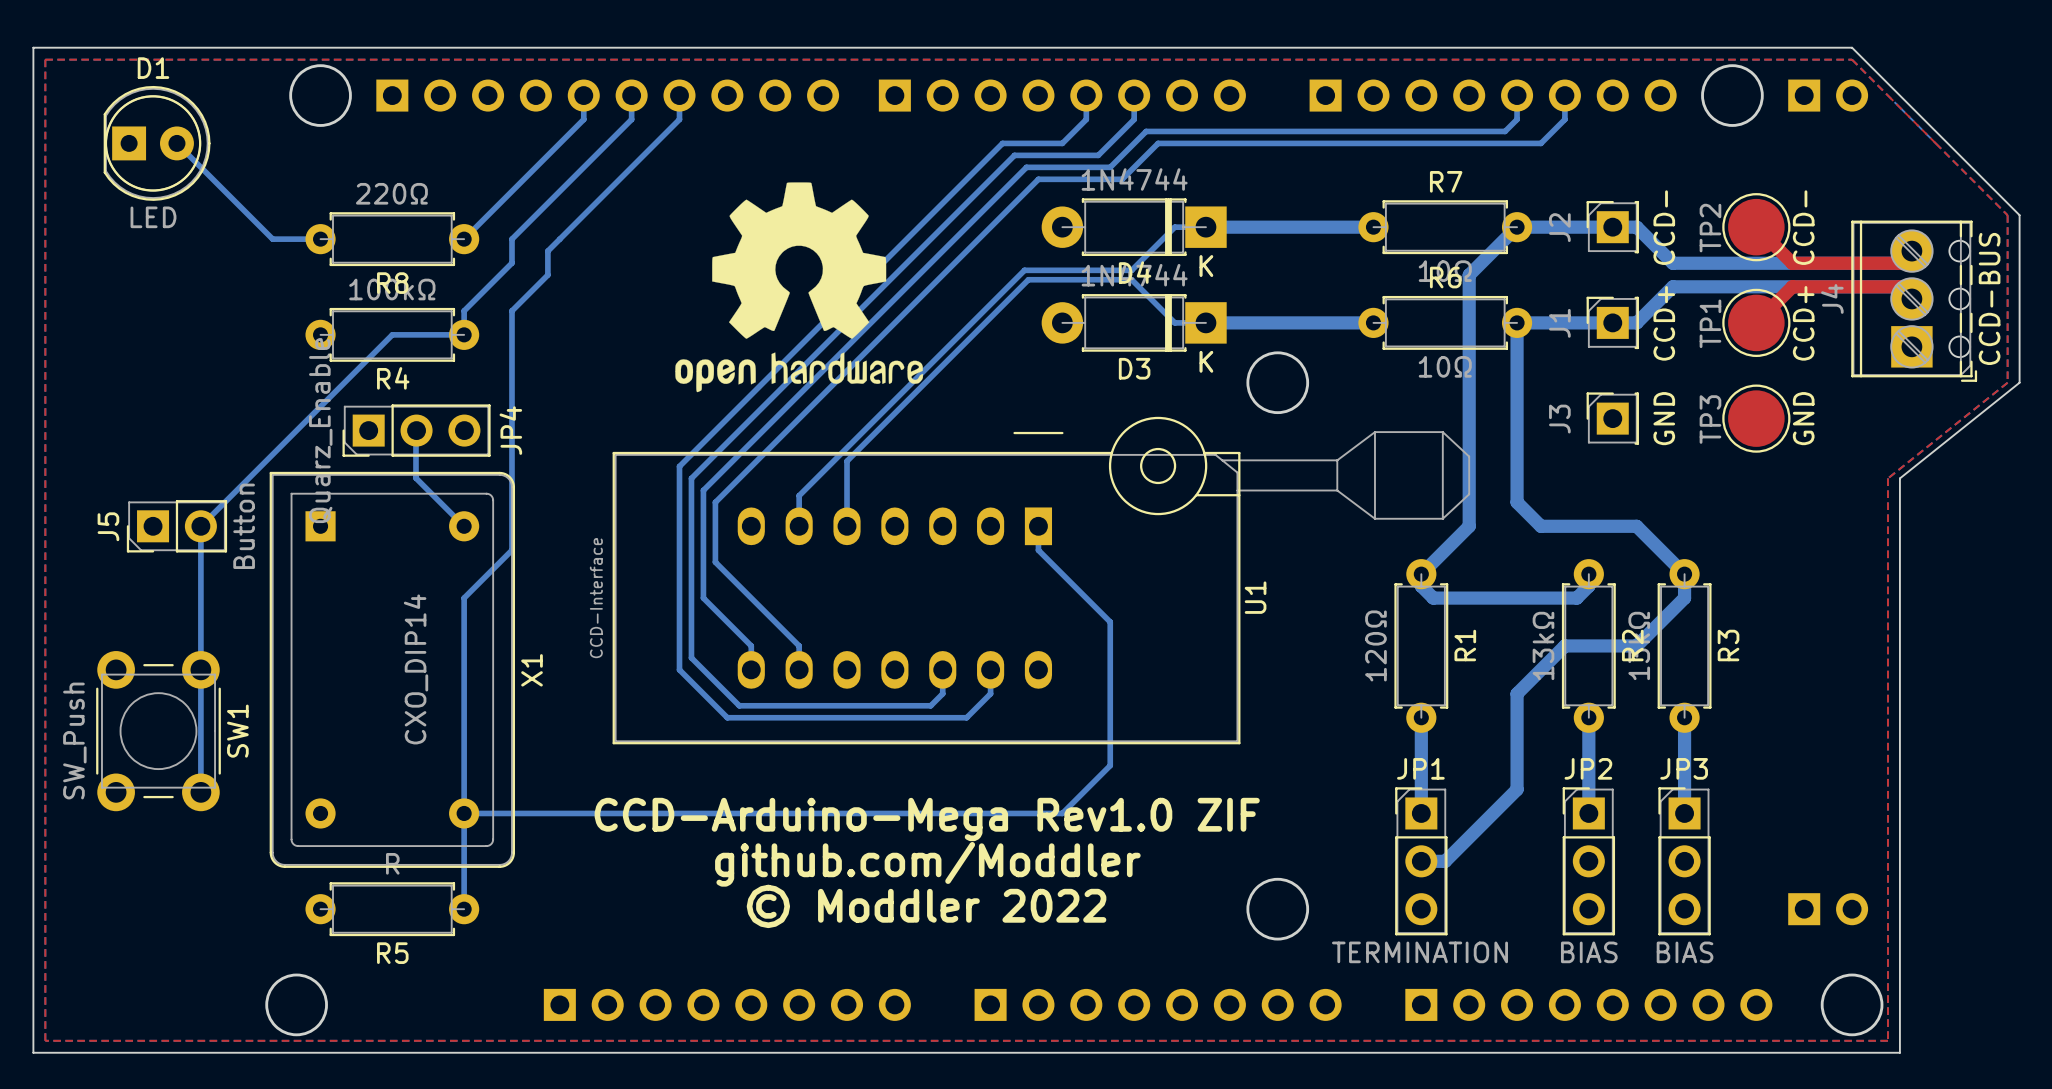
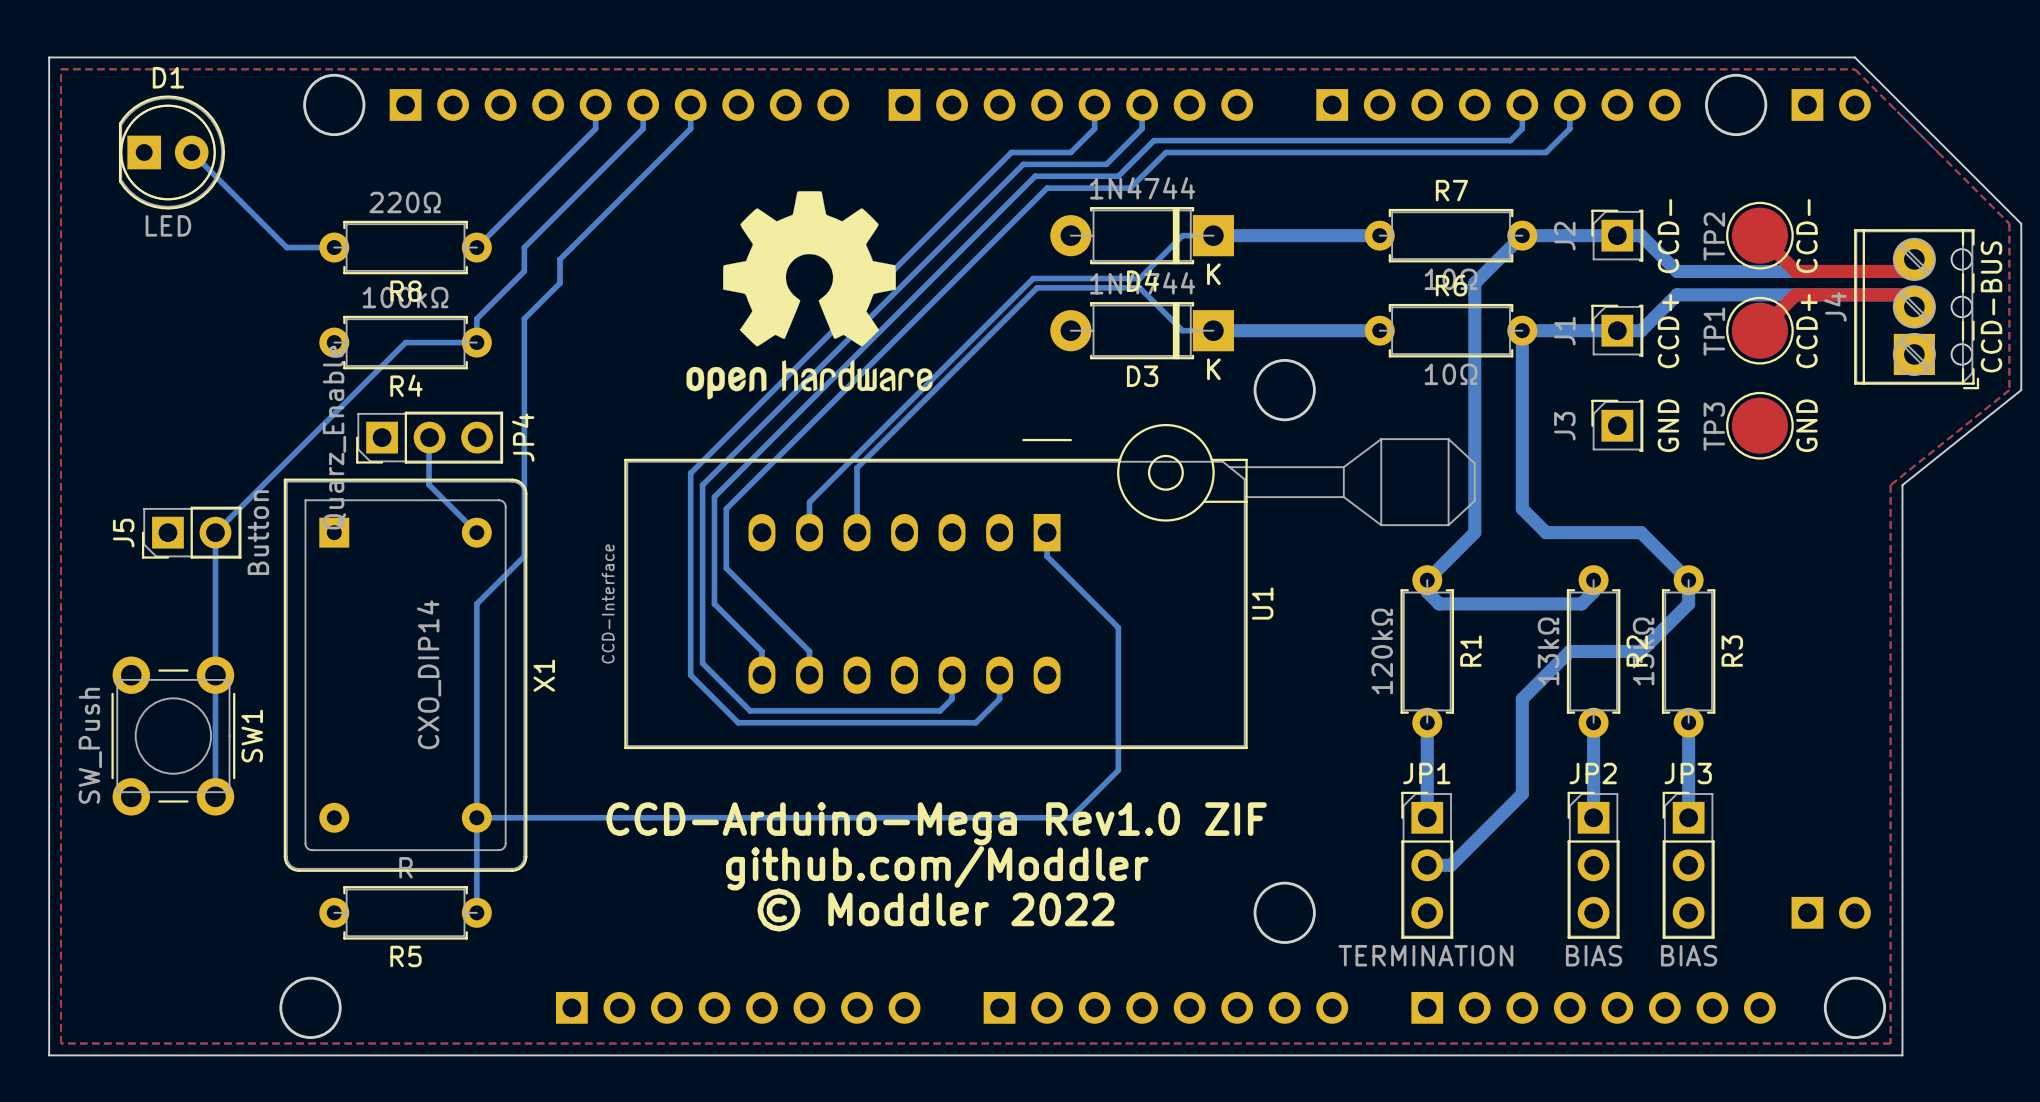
R1 value: 120Ω (1375, 645) -> 120kΩ (1382, 651)

